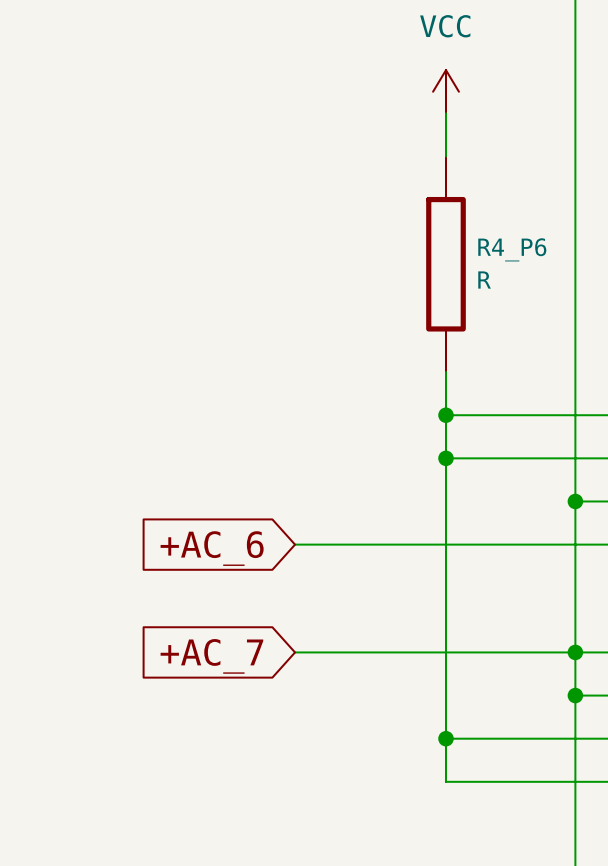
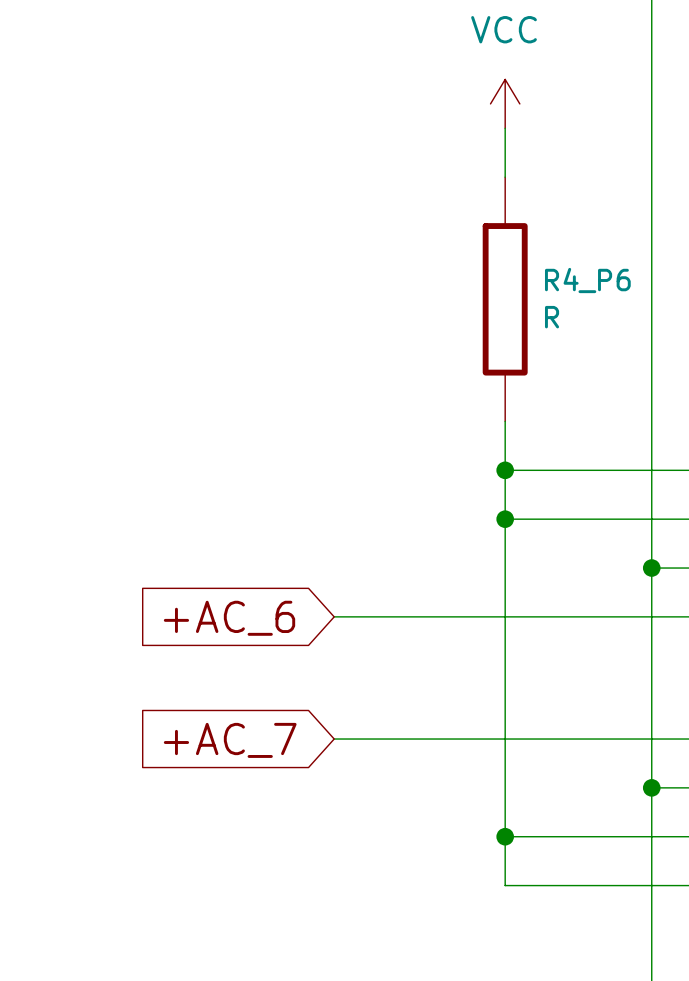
junction: (575, 652) -> none

